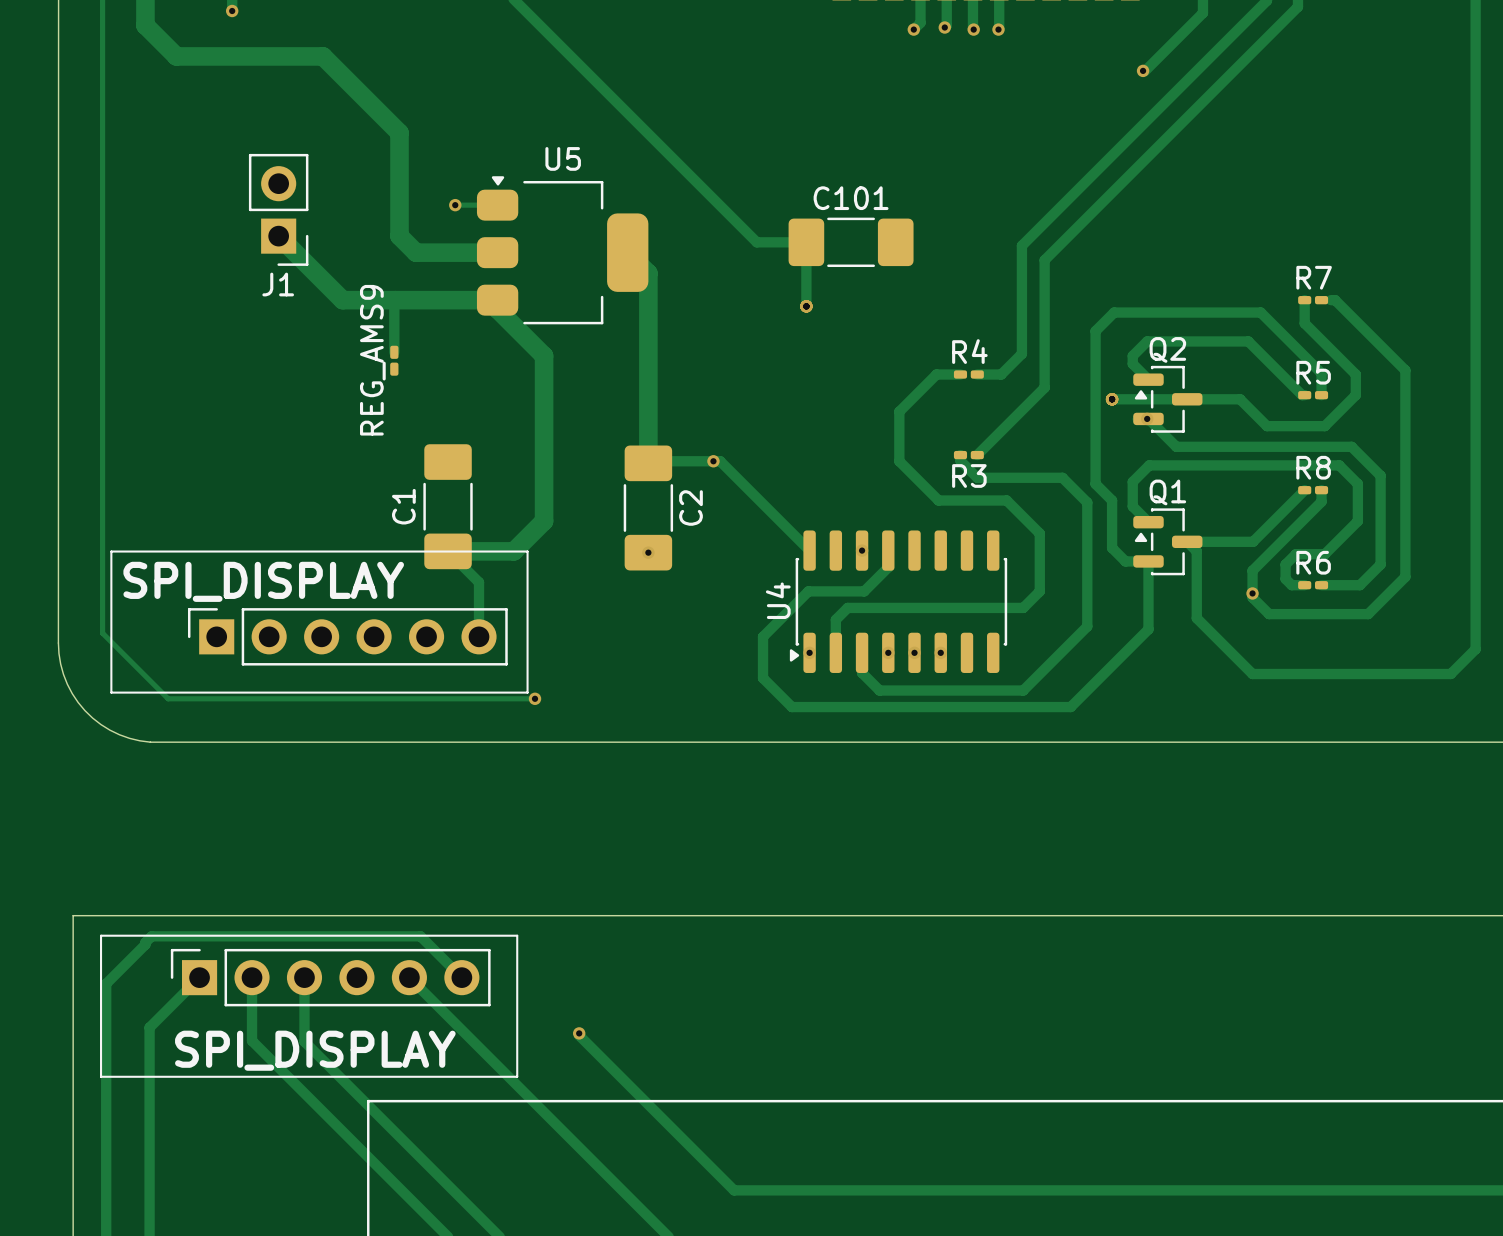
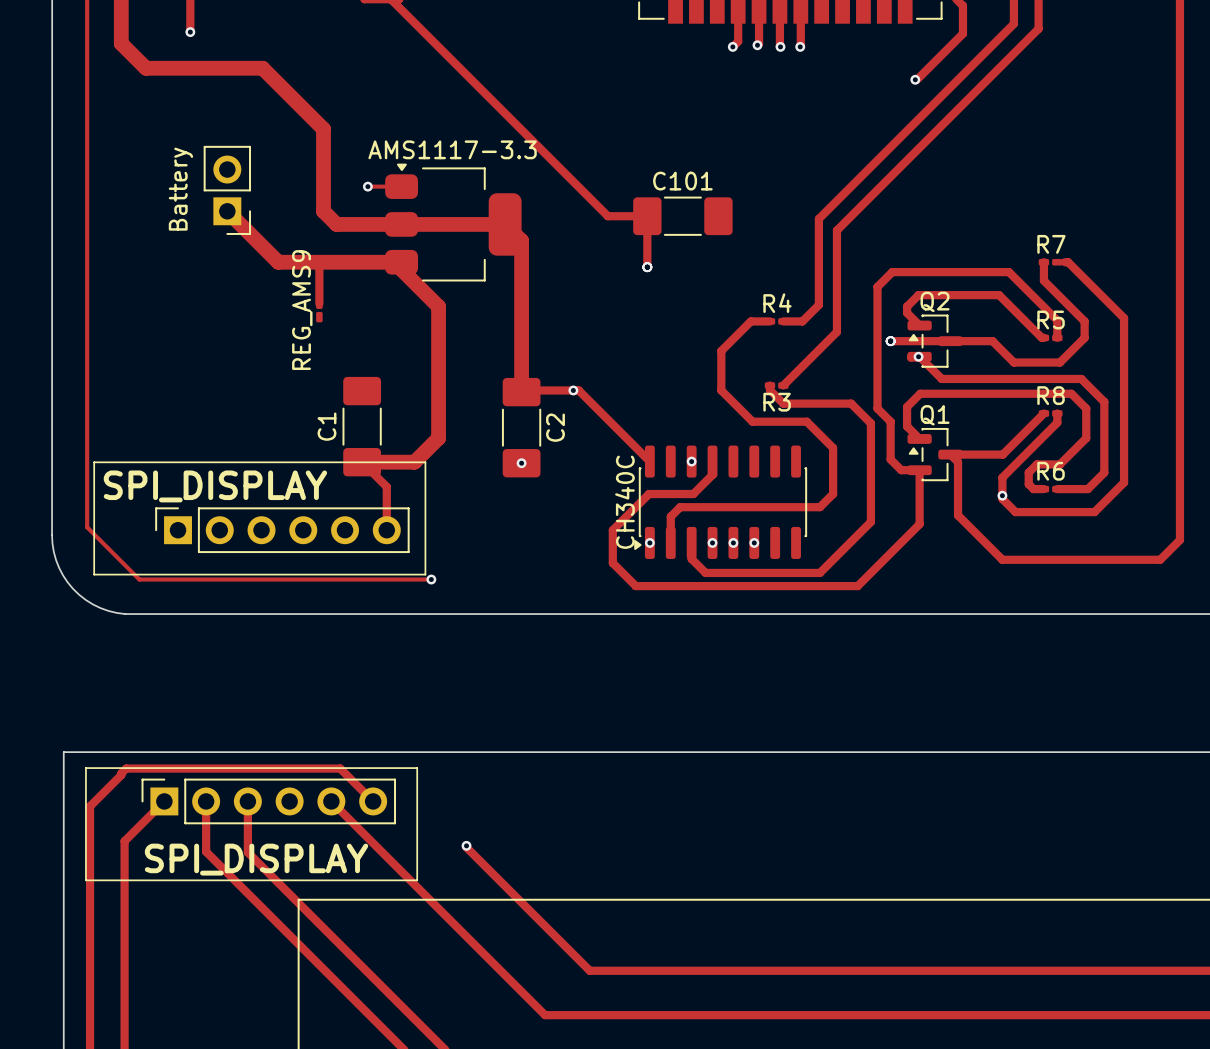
U5 name: U5 (563, 158) -> AMS1117-3.3 (452, 149)
track: none -> (401, 224) (505, 224)
J1 name: J1 (278, 284) -> Battery (180, 189)
U4 name: U4 (778, 600) -> CH340C (624, 502)

